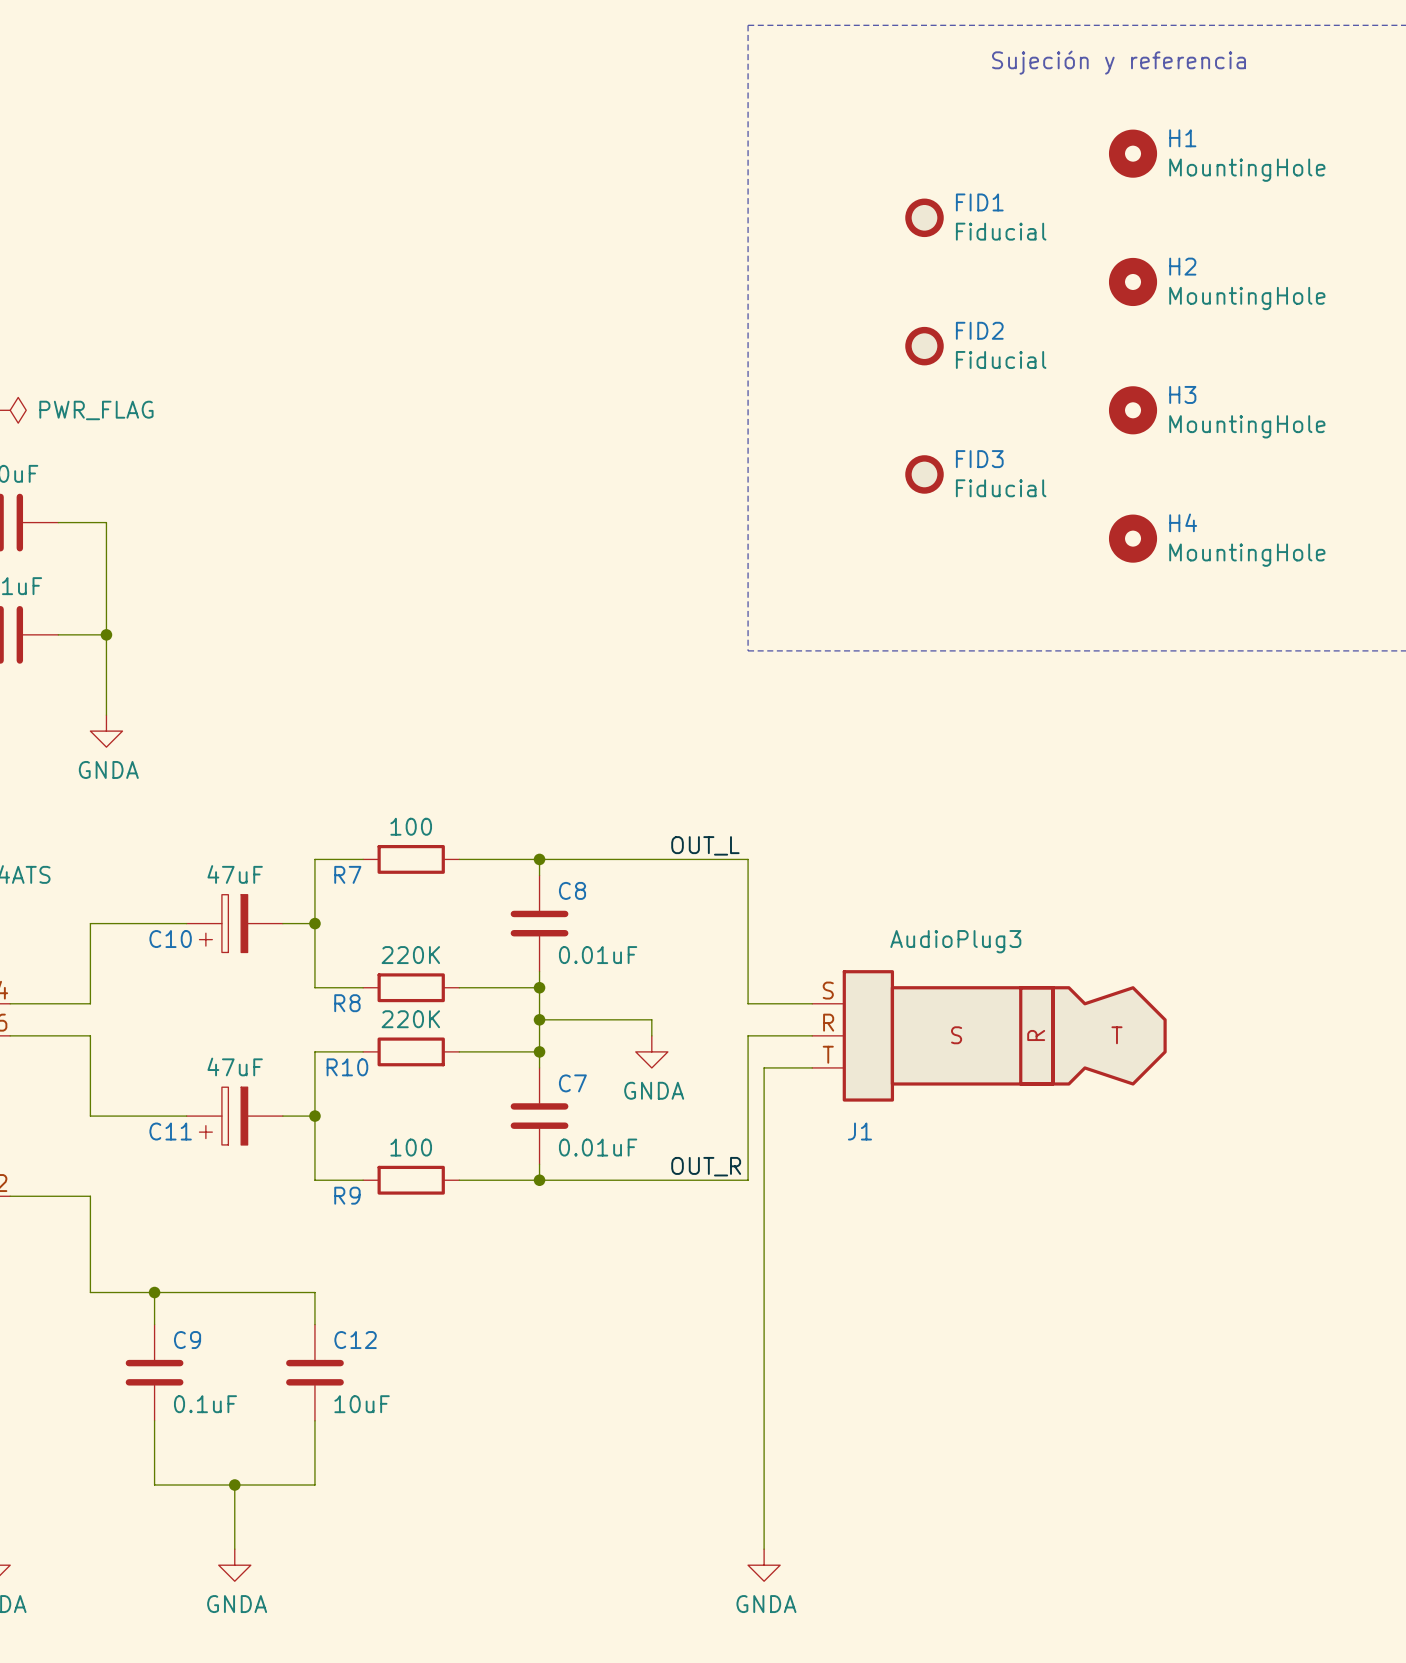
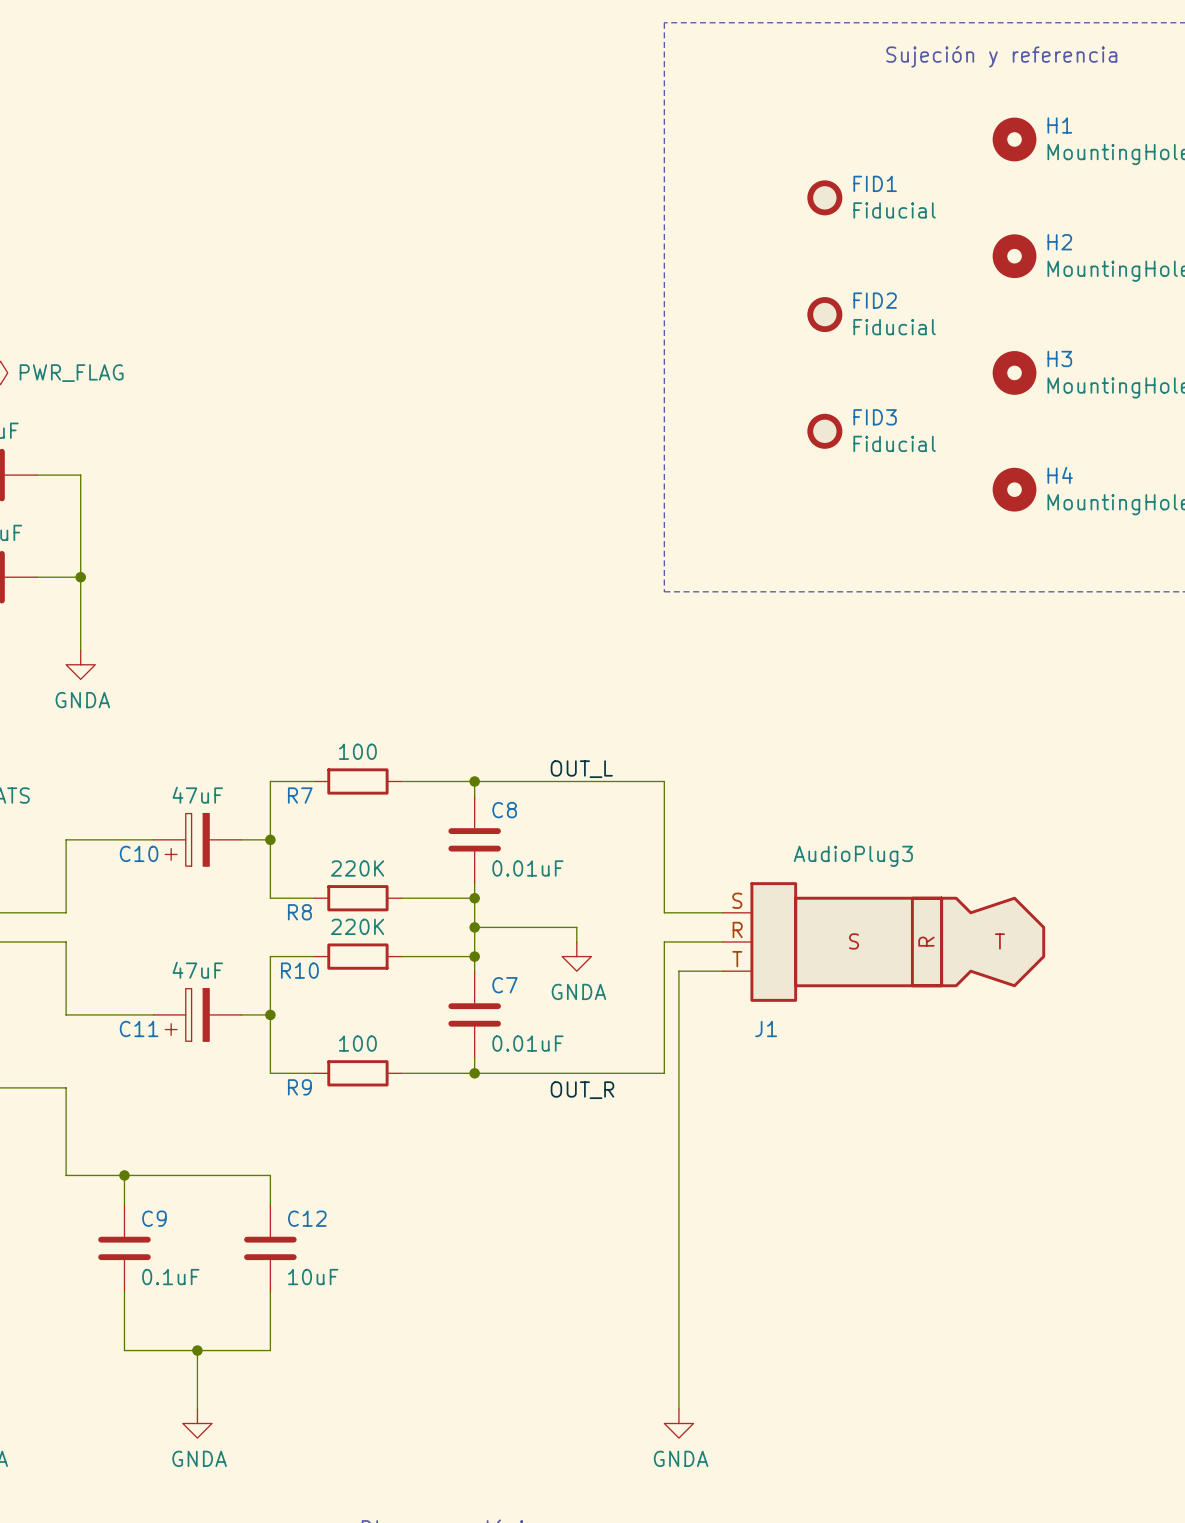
label position: OUT_L (705, 845) -> OUT_L (581, 769)
label position: OUT_R (706, 1166) -> OUT_R (582, 1090)

